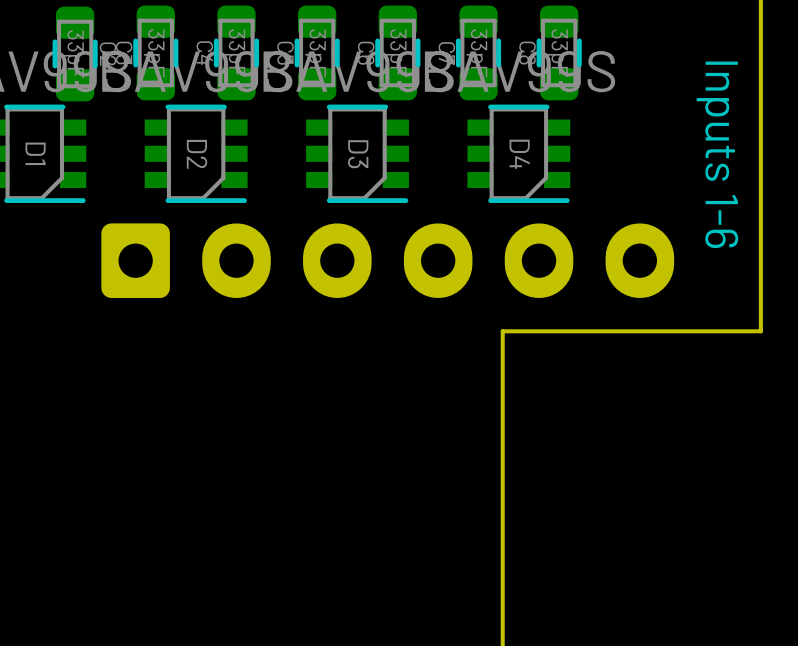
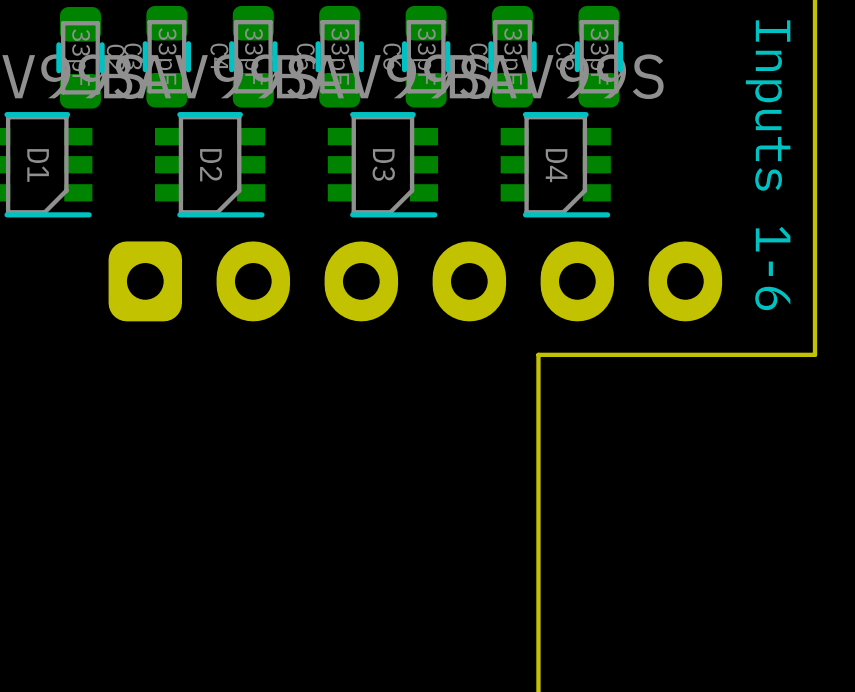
part footprint: [101, 223, 675, 299] -> [108, 241, 723, 322]

